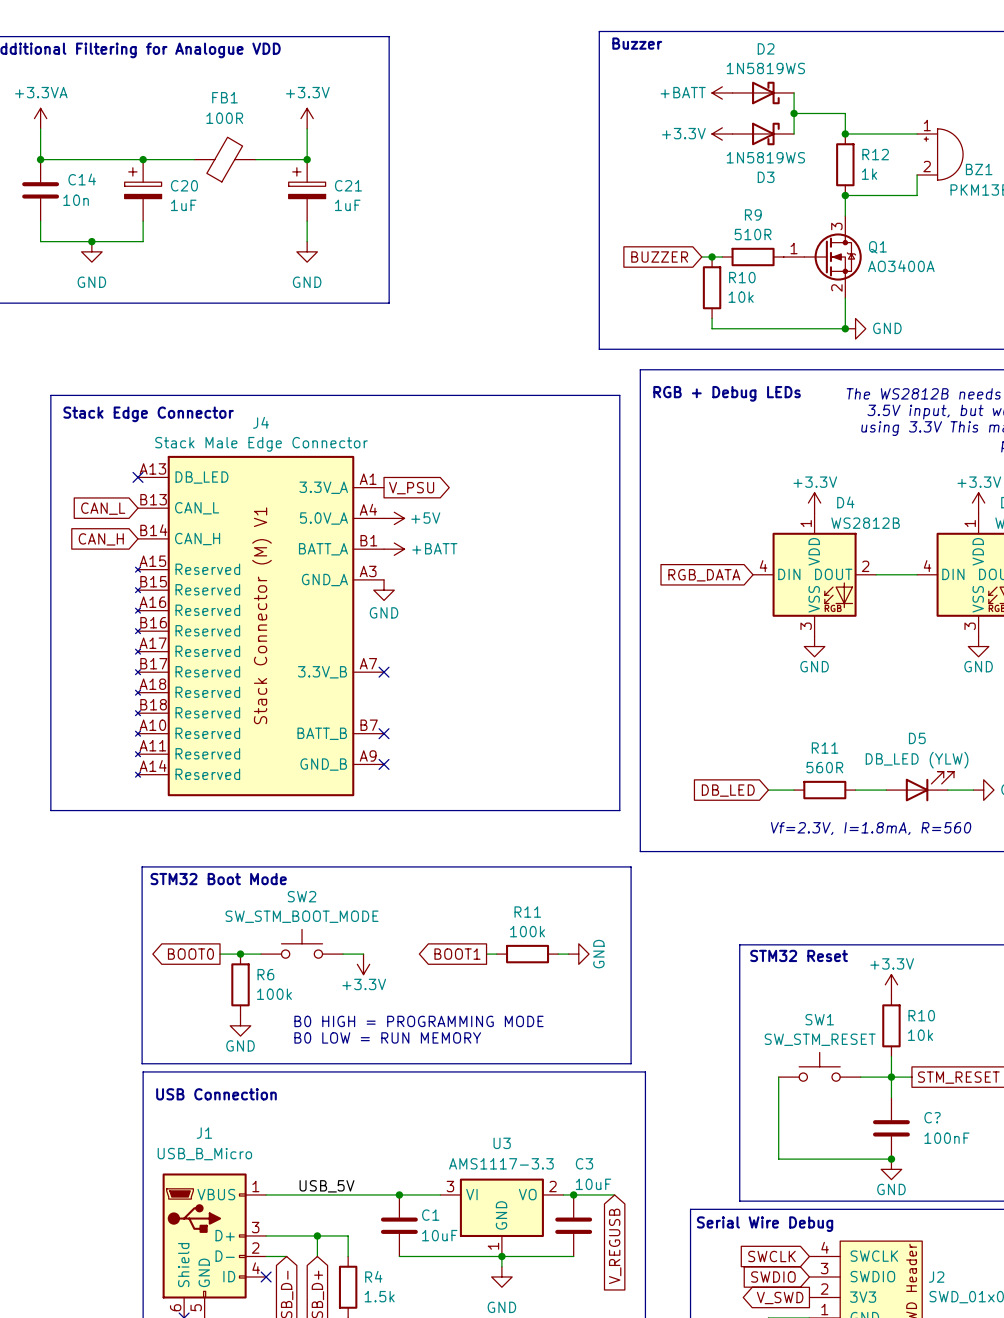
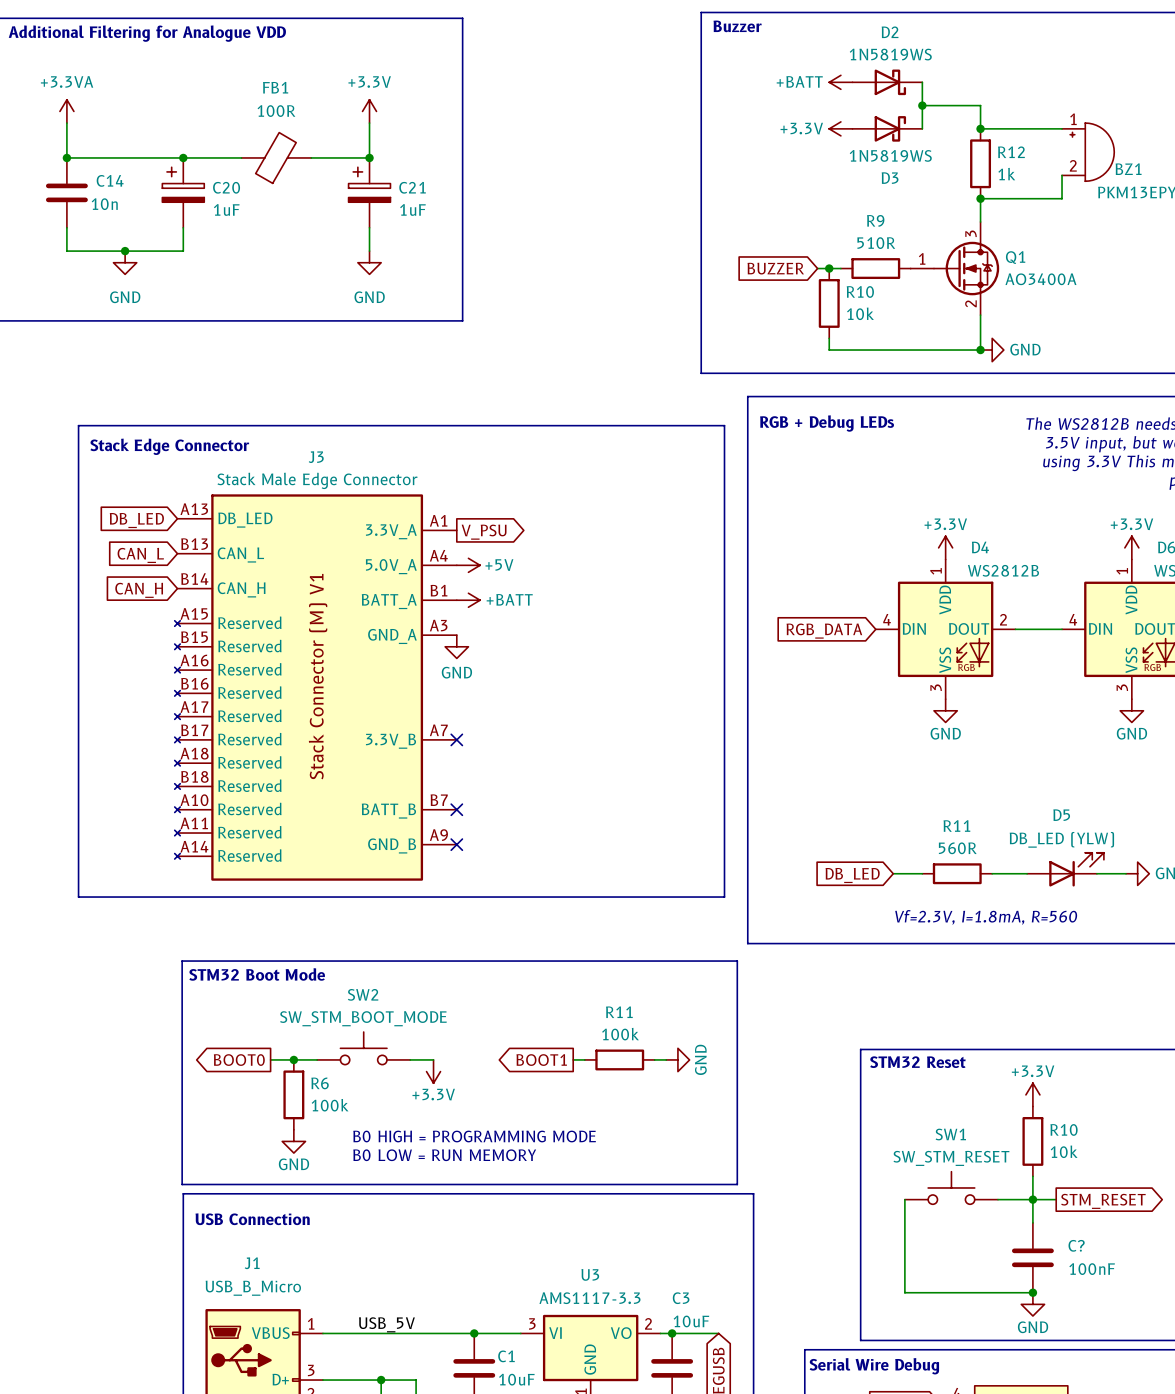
J4 name: J4 (261, 422) -> J3 (316, 457)
global label: none -> DB_LED (136, 520)
no-connect mark: (137, 477) -> none

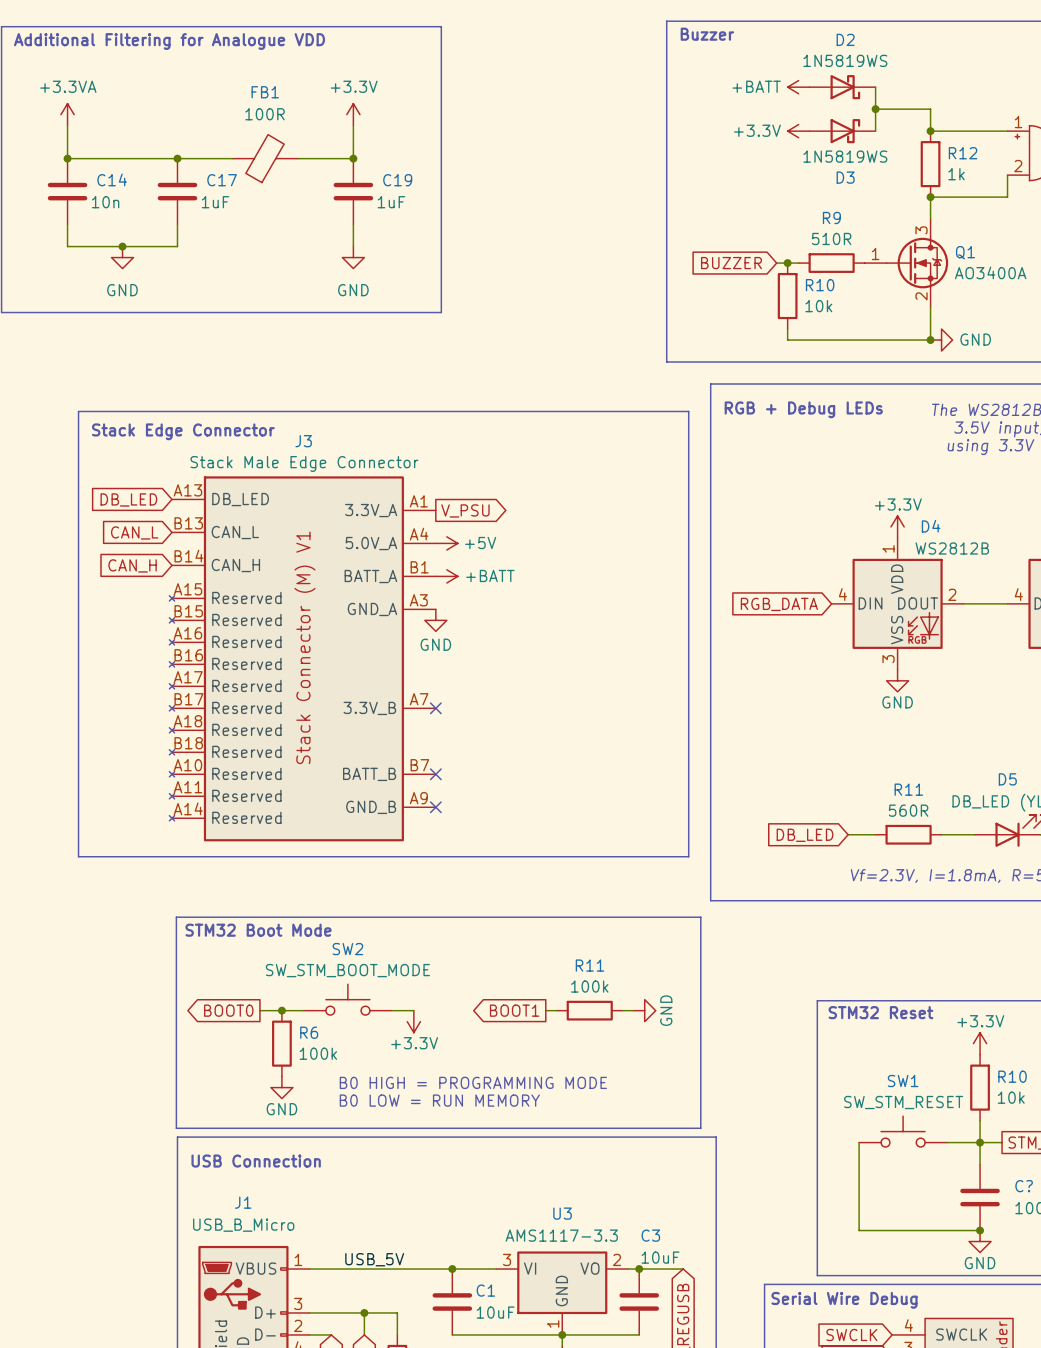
C20: 1uF (183, 192) -> none
C17: none -> 1uF (177, 191)
C21: 1uF (369, 192) -> none
C19: none -> 1uF (353, 191)

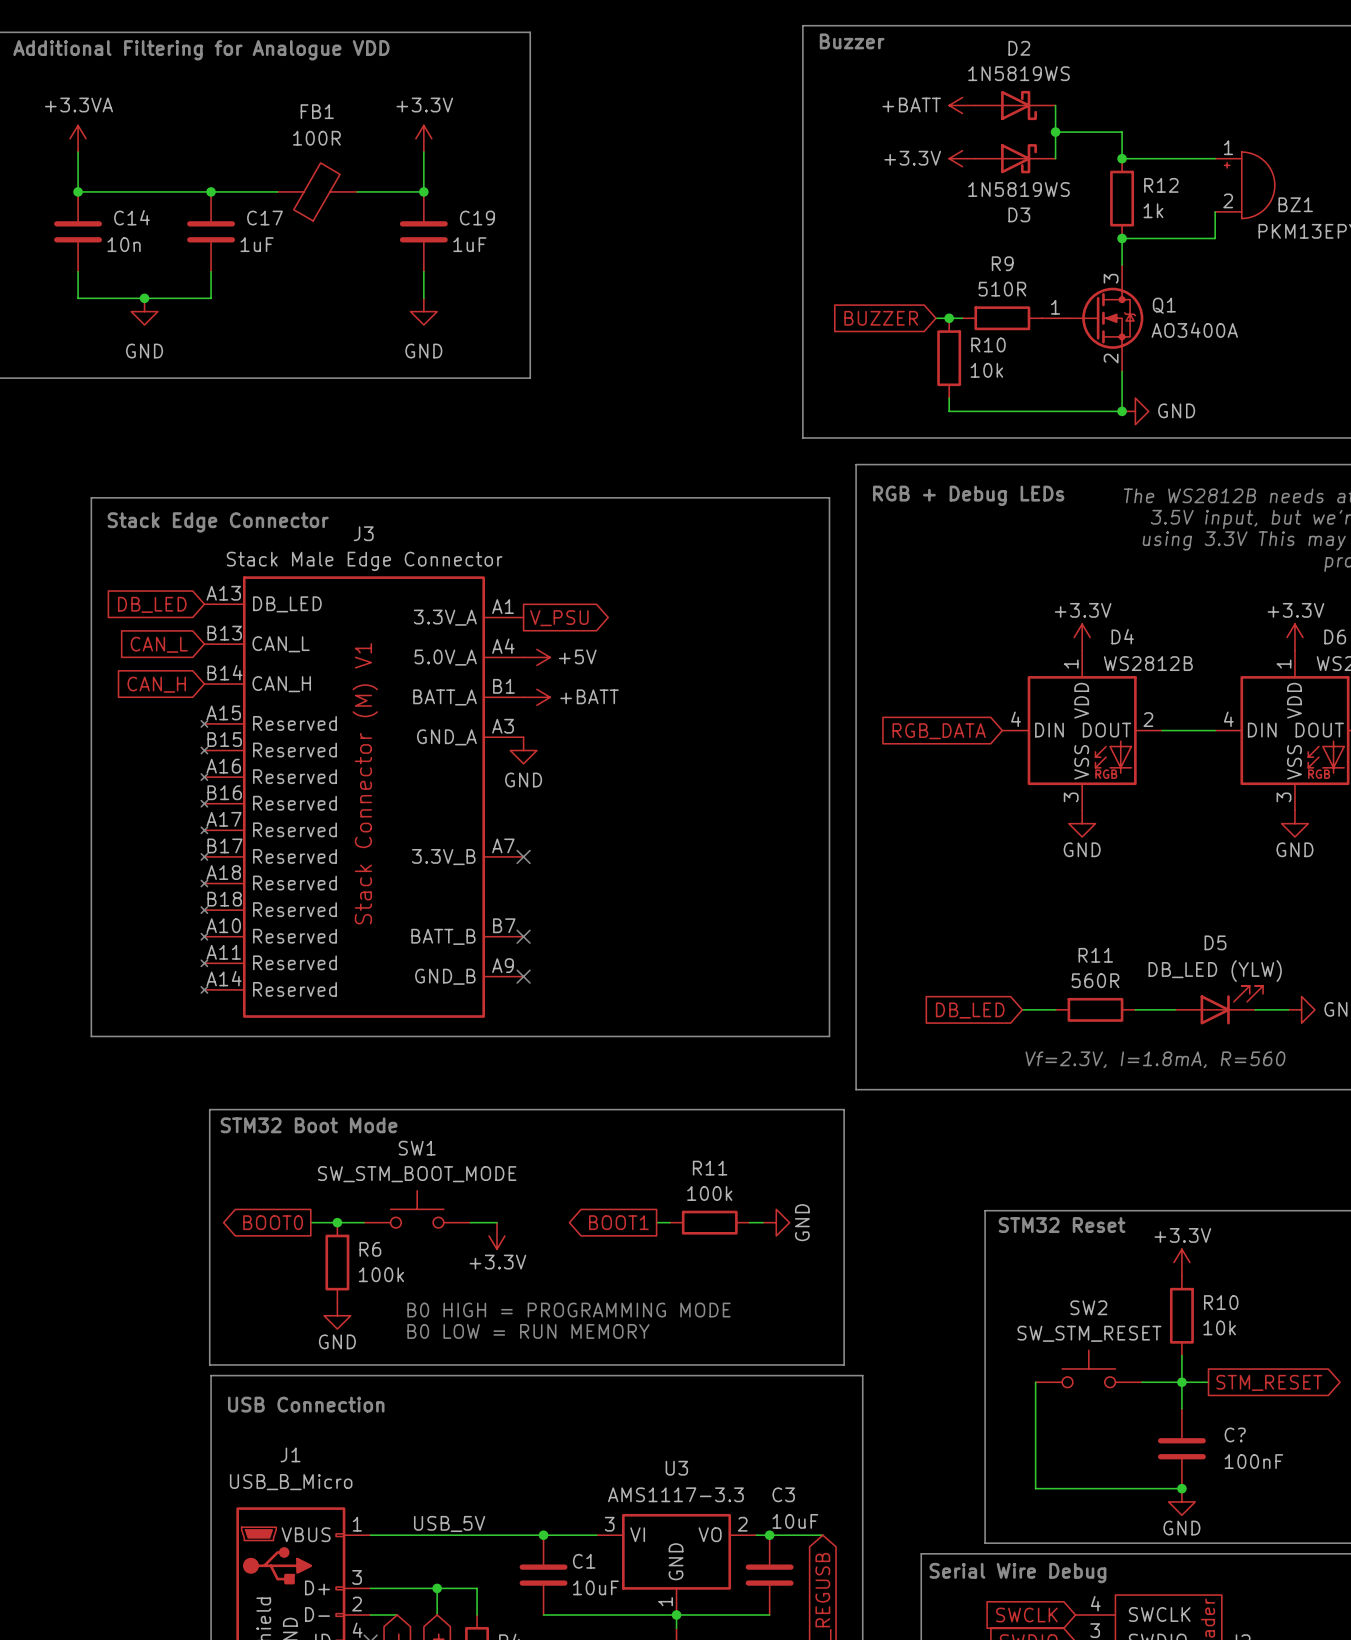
SW2 name: SW2 (347, 949) -> SW1 (417, 1148)
SW1 name: SW1 (903, 1081) -> SW2 (1088, 1307)

